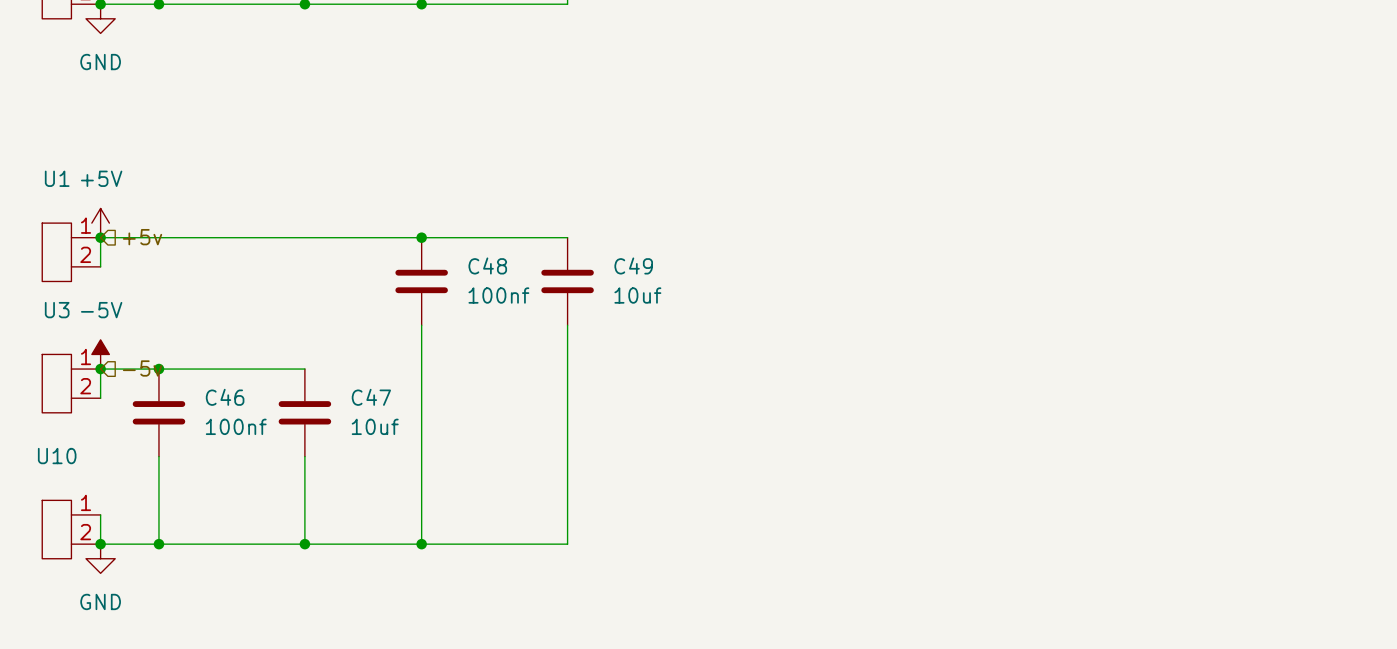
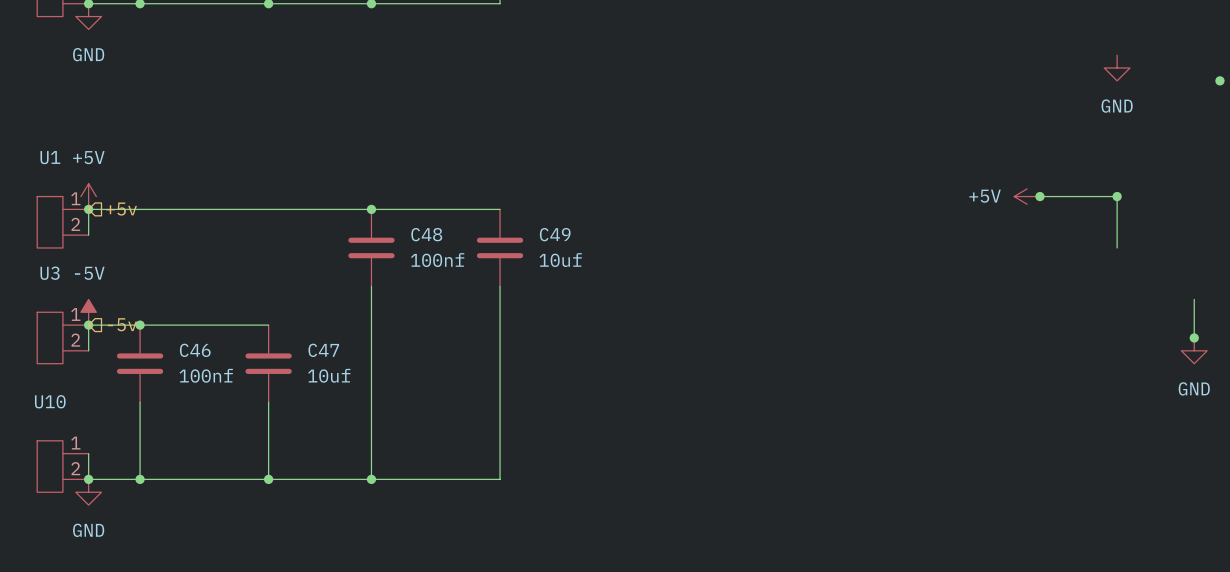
power symbol: none -> GND (1117, 67)
junction: none -> (1219, 80)
power symbol: none -> +5V (1027, 196)
wire: none -> (1039, 196) (1117, 196) (1117, 247)
junction: none -> (1039, 196)
junction: none -> (1117, 196)
wire: none -> (1194, 299) (1194, 337)
junction: none -> (1194, 337)
power symbol: none -> GND (1194, 350)

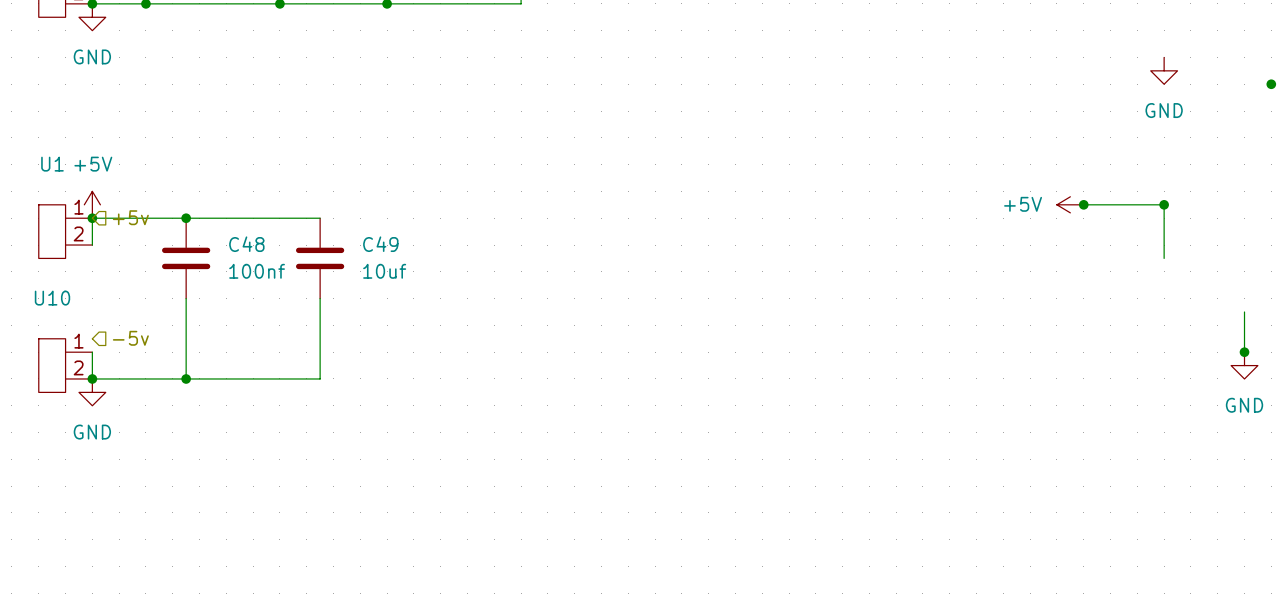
junction: none -> (186, 218)
wire: (307, 209) (500, 209) -> none
junction: (371, 209) -> none
C48 position: (371, 247) -> (186, 258)
C49 position: (500, 247) -> (320, 258)
wire: none -> (320, 298) (320, 378) (92, 378) (92, 365)
wire: (371, 286) (371, 479) -> none
wire: (500, 286) (500, 479) (88, 479) (88, 453) -> none
power symbol: -5V (88, 312) -> none
junction: (88, 325) -> none
junction: (140, 325) -> none
wire: (268, 325) (88, 325) (88, 337) -> none
U3: (62, 337) -> none
junction: none -> (92, 378)
C46: 100nf (140, 363) -> none
junction: none -> (186, 378)
C47: 10uf (268, 363) -> none
wire: (140, 402) (140, 479) -> (186, 298) (186, 378)
wire: (268, 402) (268, 479) -> none
U10 position: (62, 466) -> (65, 365)
junction: (88, 479) -> none
junction: (140, 479) -> none
junction: (268, 479) -> none
junction: (371, 479) -> none
power symbol position: GND (88, 492) -> GND (92, 392)

